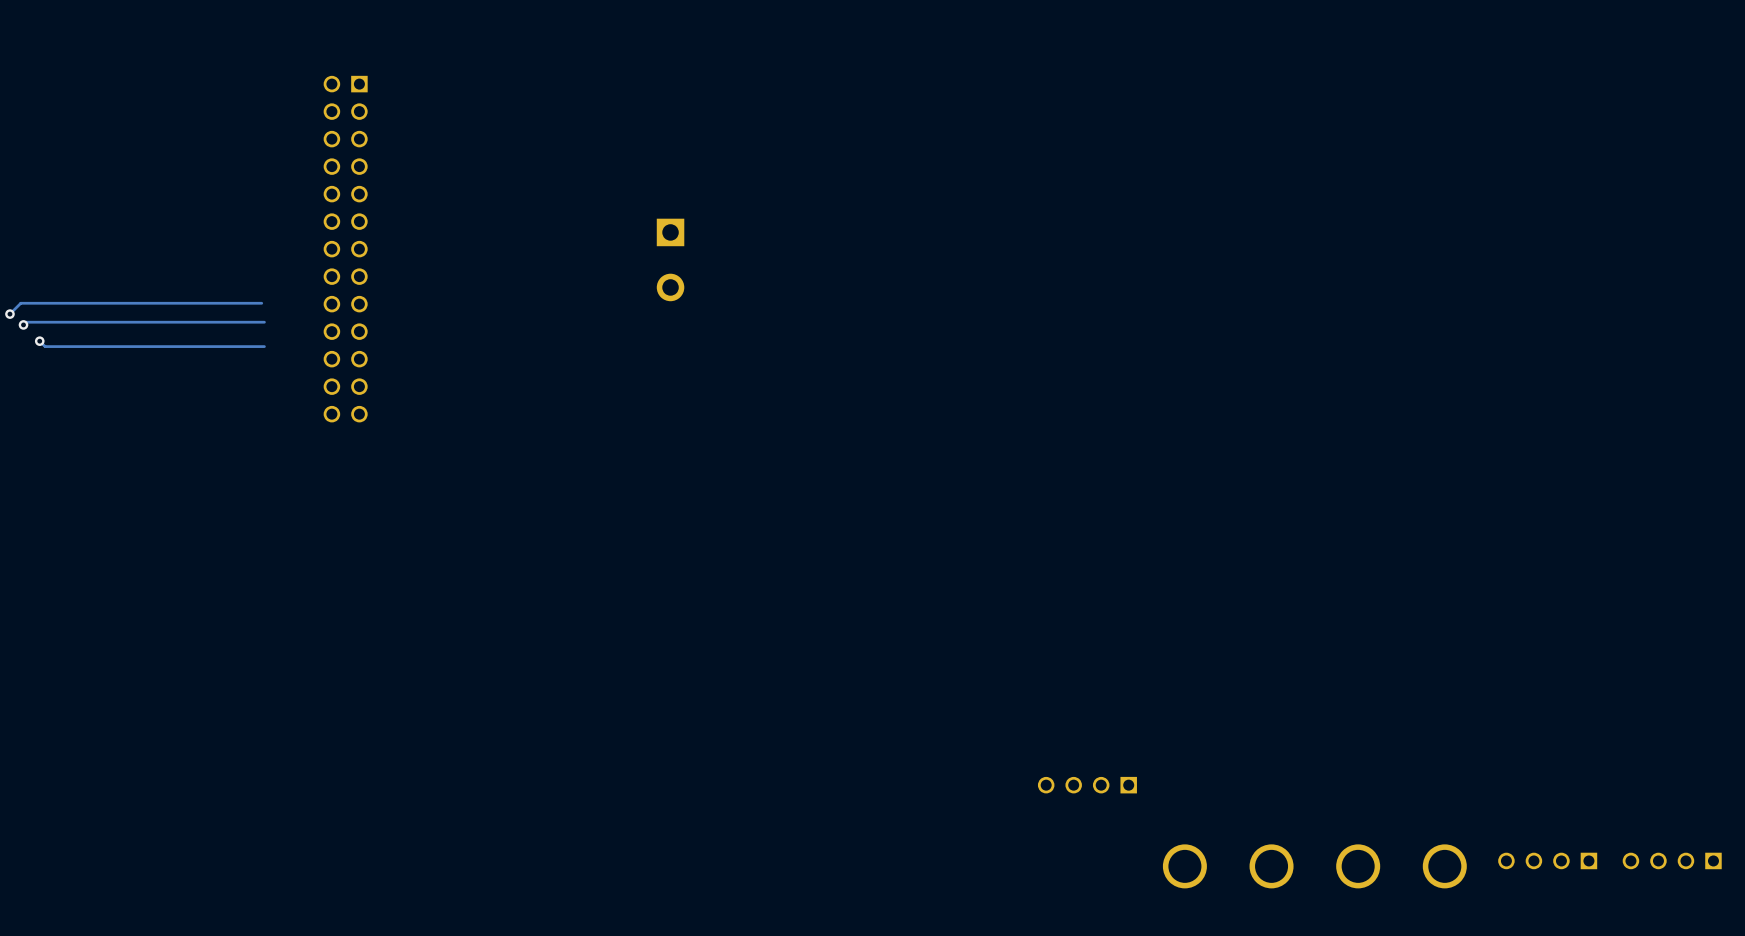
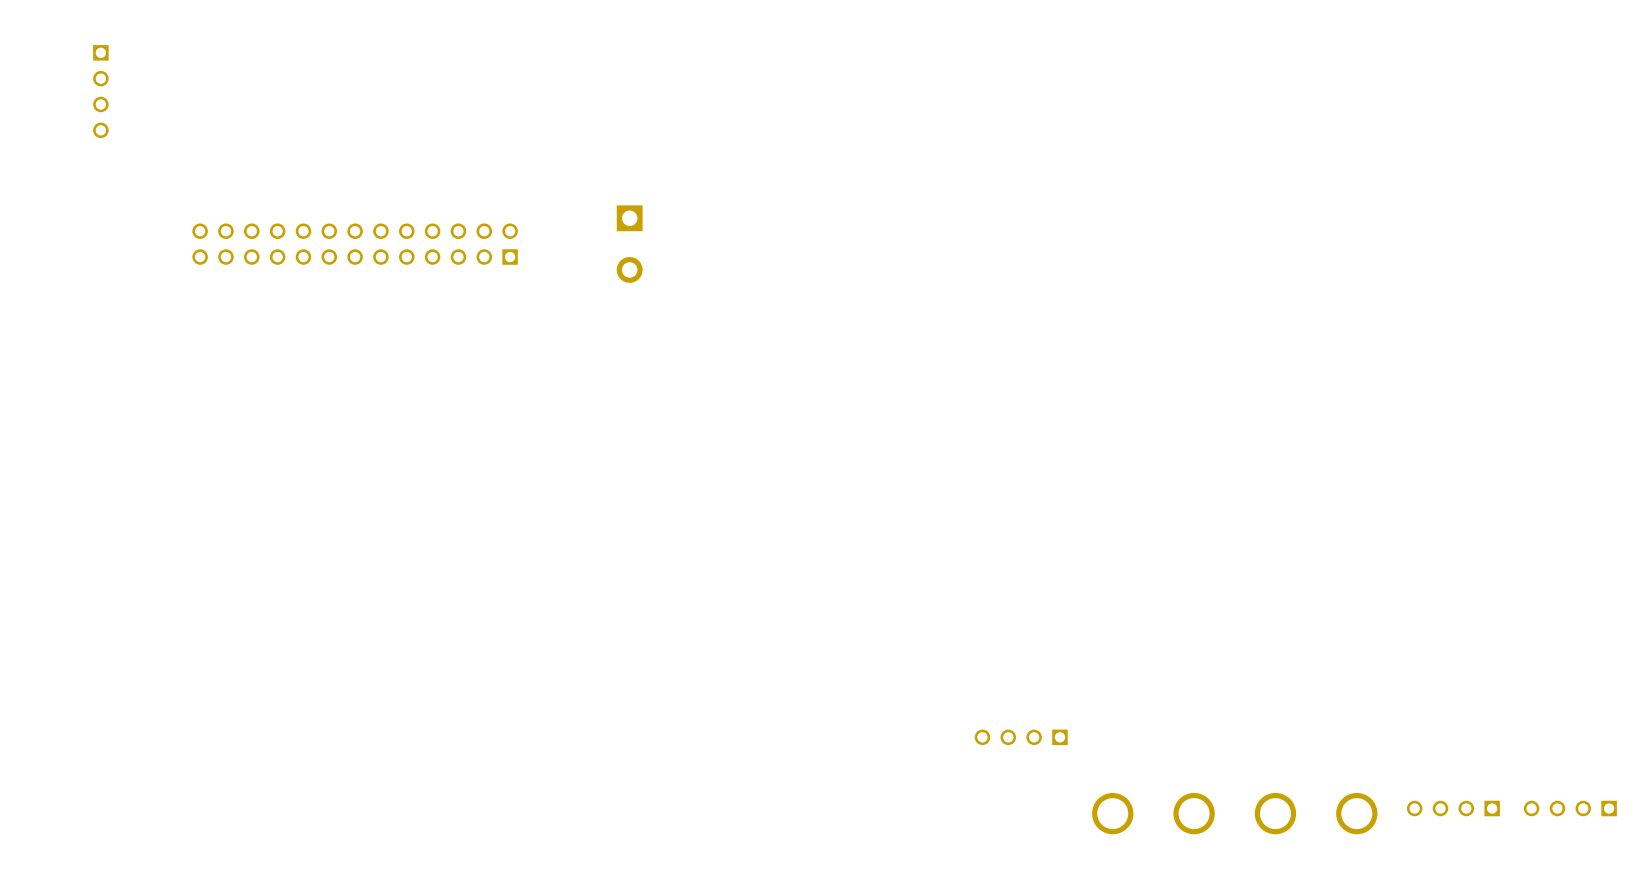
part: none -> (100, 91)
part rotation: 0° (345, 249) -> 90° clockwise (355, 244)
track: (261, 303) (20, 303) (9, 314) -> none
via: (9, 314) -> none
track: (264, 322) (26, 322) (23, 324) -> none
via: (23, 324) -> none
track: (39, 341) (45, 346) (264, 346) -> none
via: (39, 341) -> none

